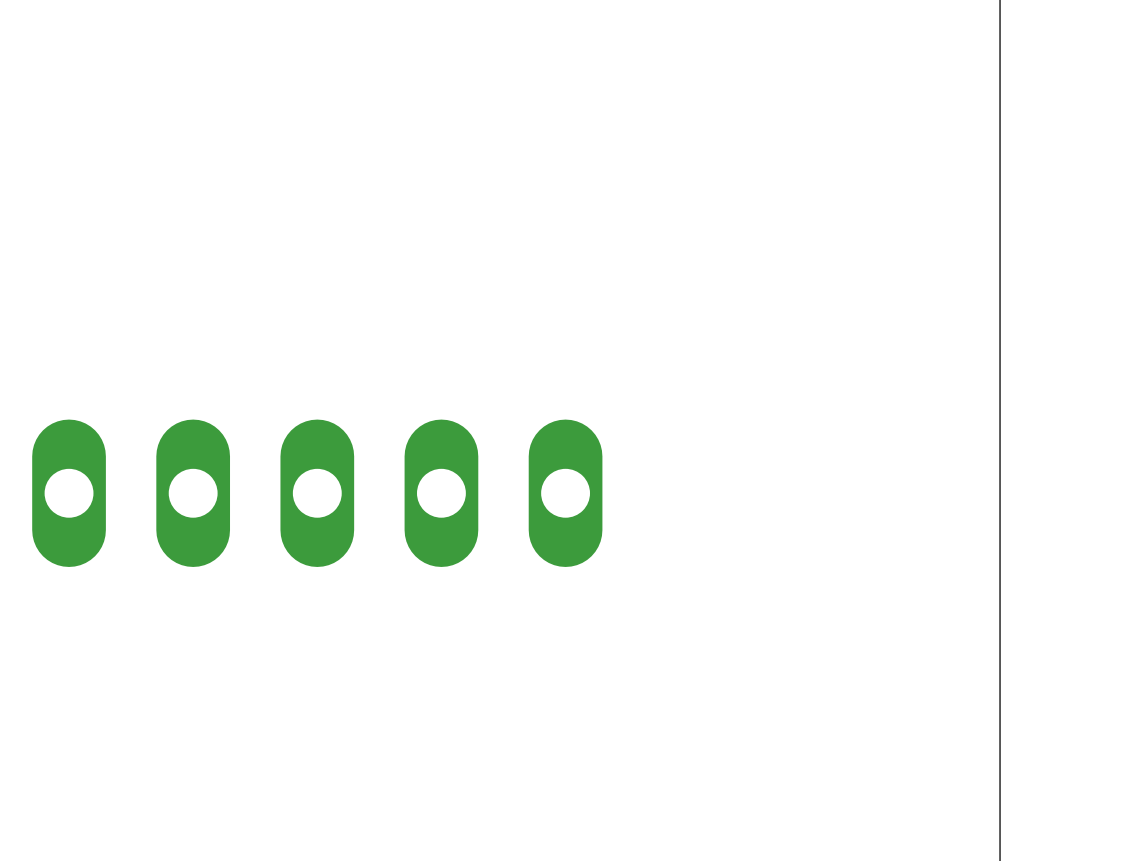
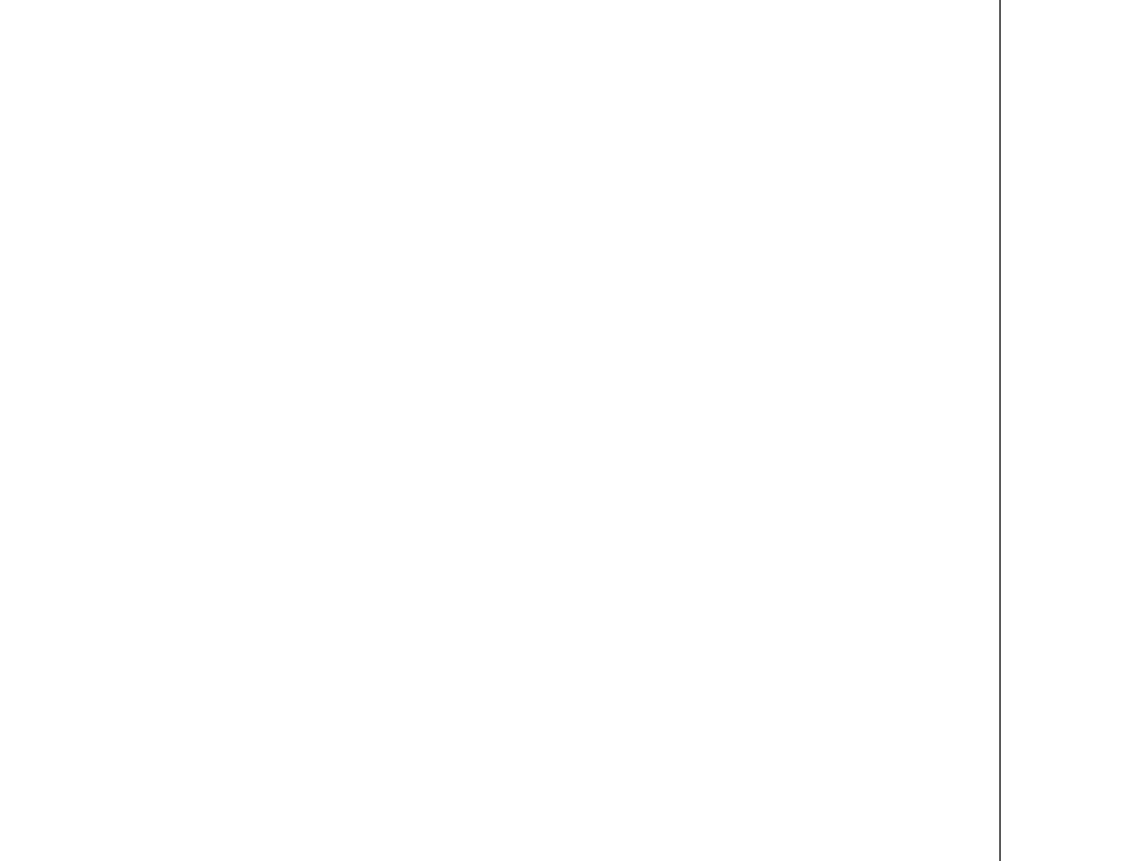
part: (317, 493) -> none

